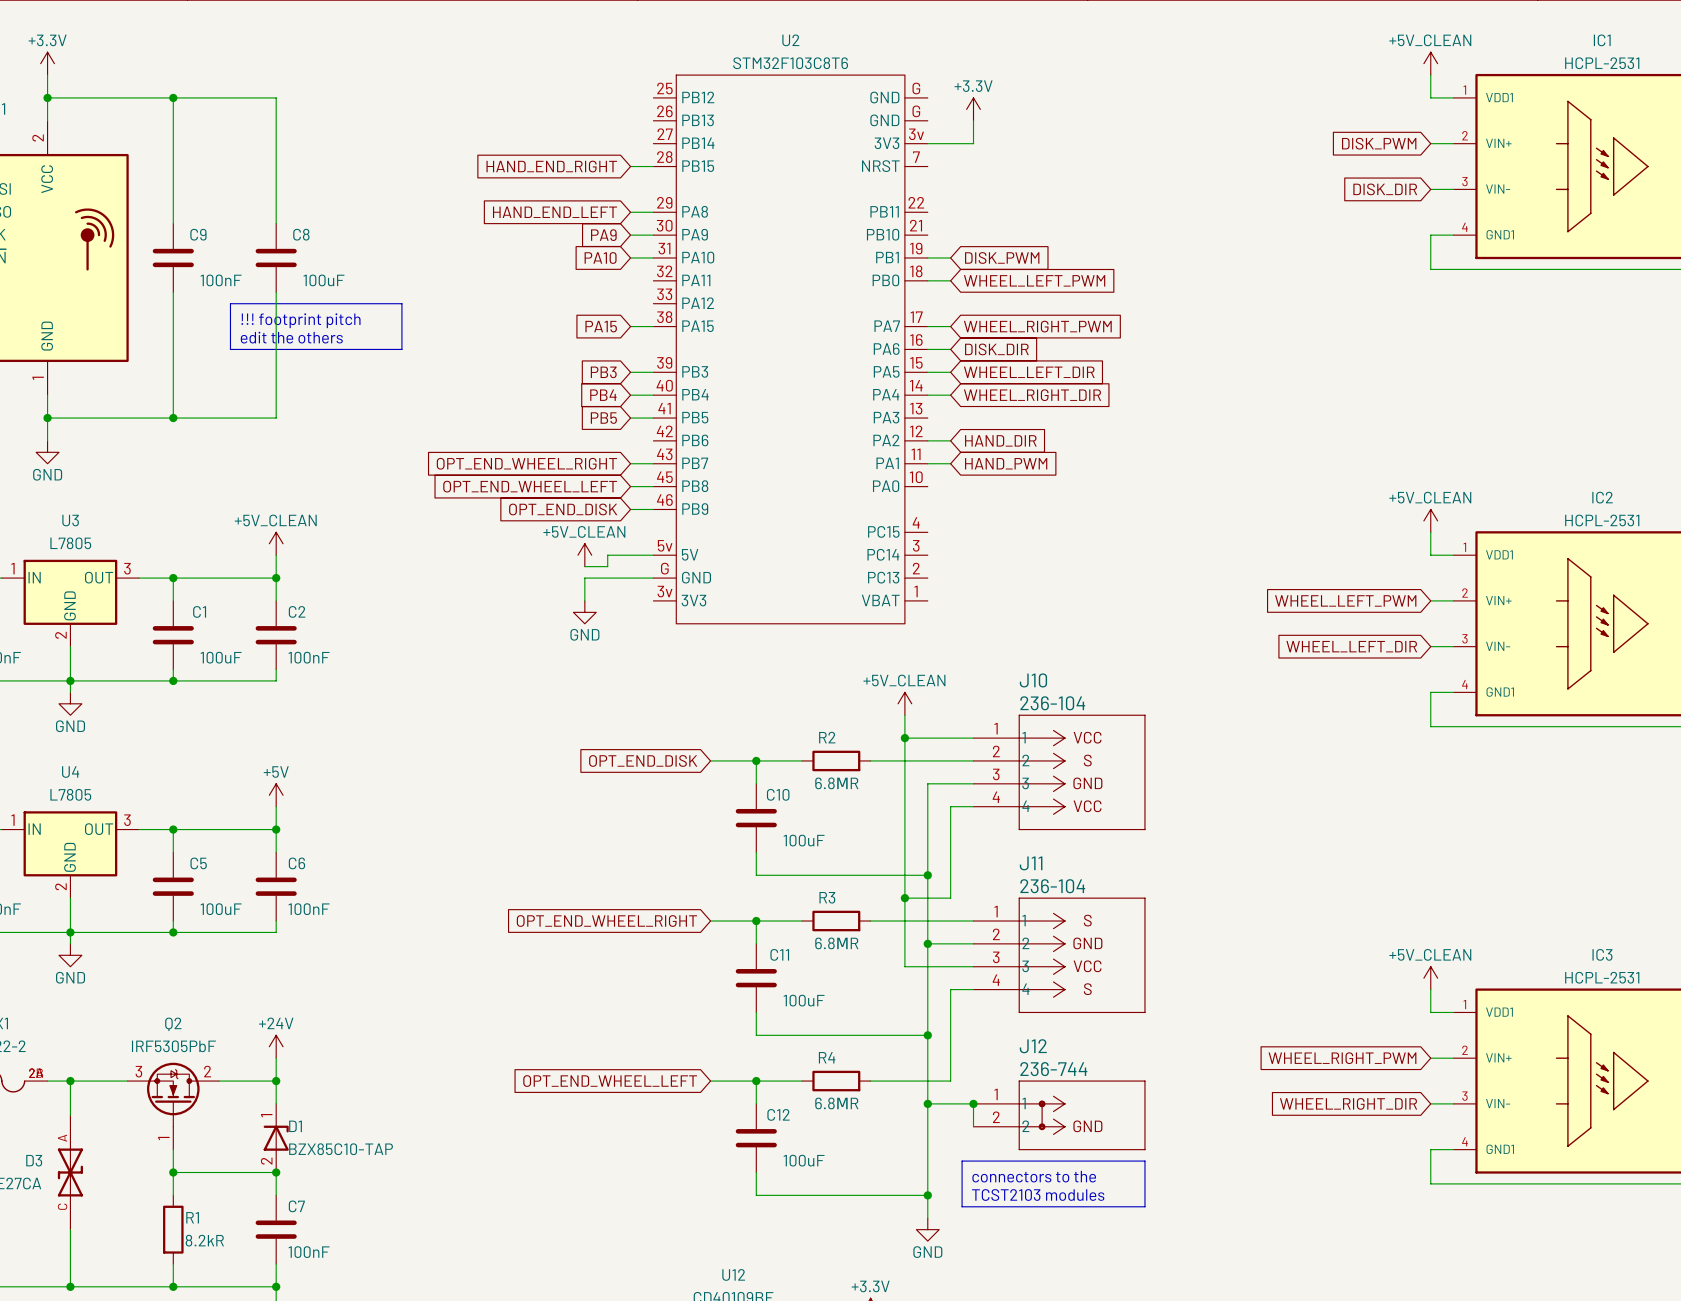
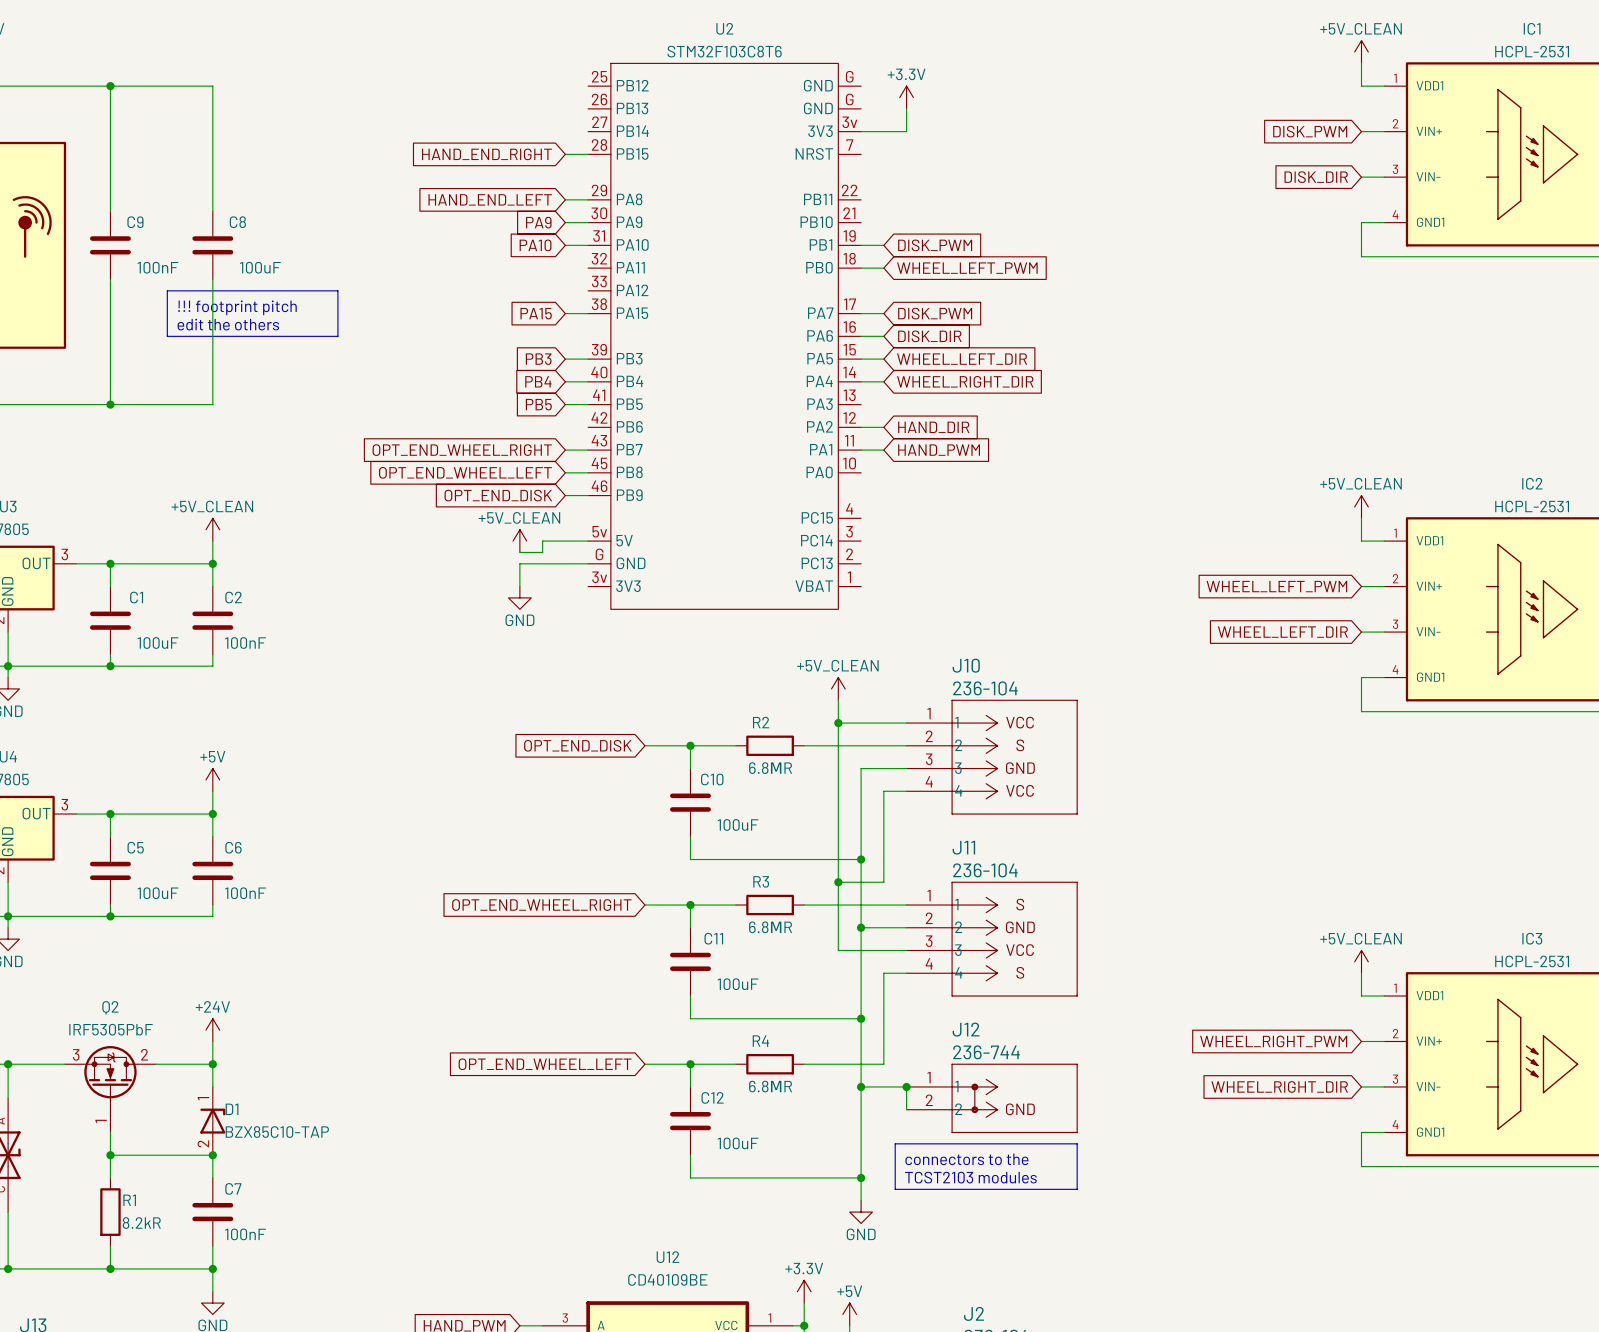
global label: WHEEL_RIGHT_PWM (1037, 326) -> DISK_PWM (935, 313)

